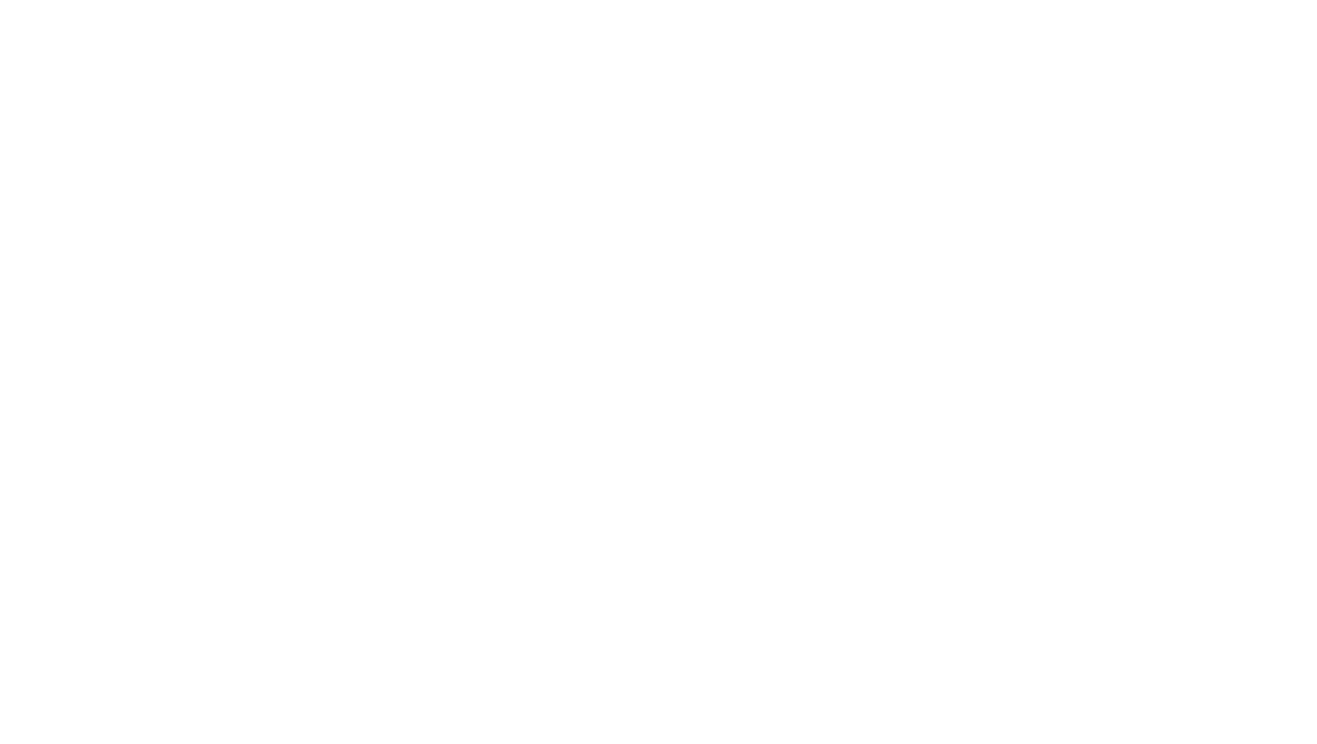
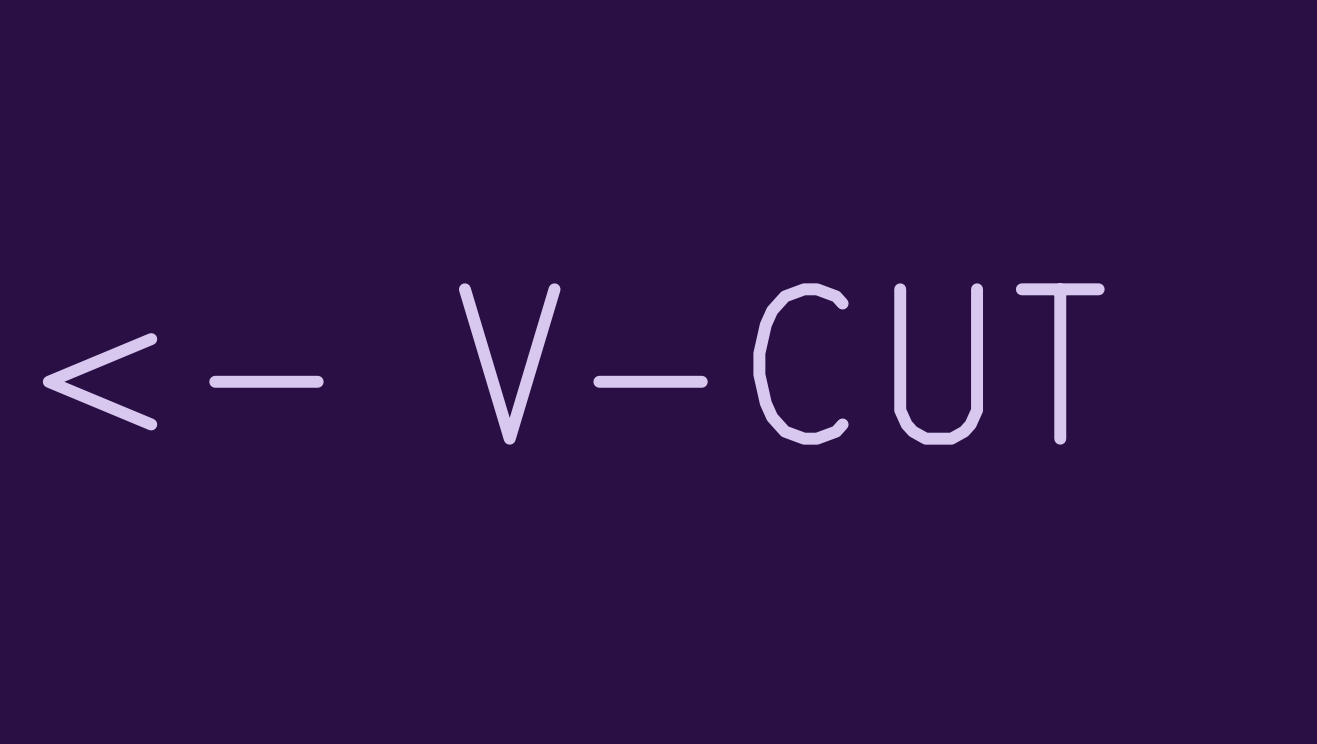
text: none -> <- V-CUT (573, 364)

